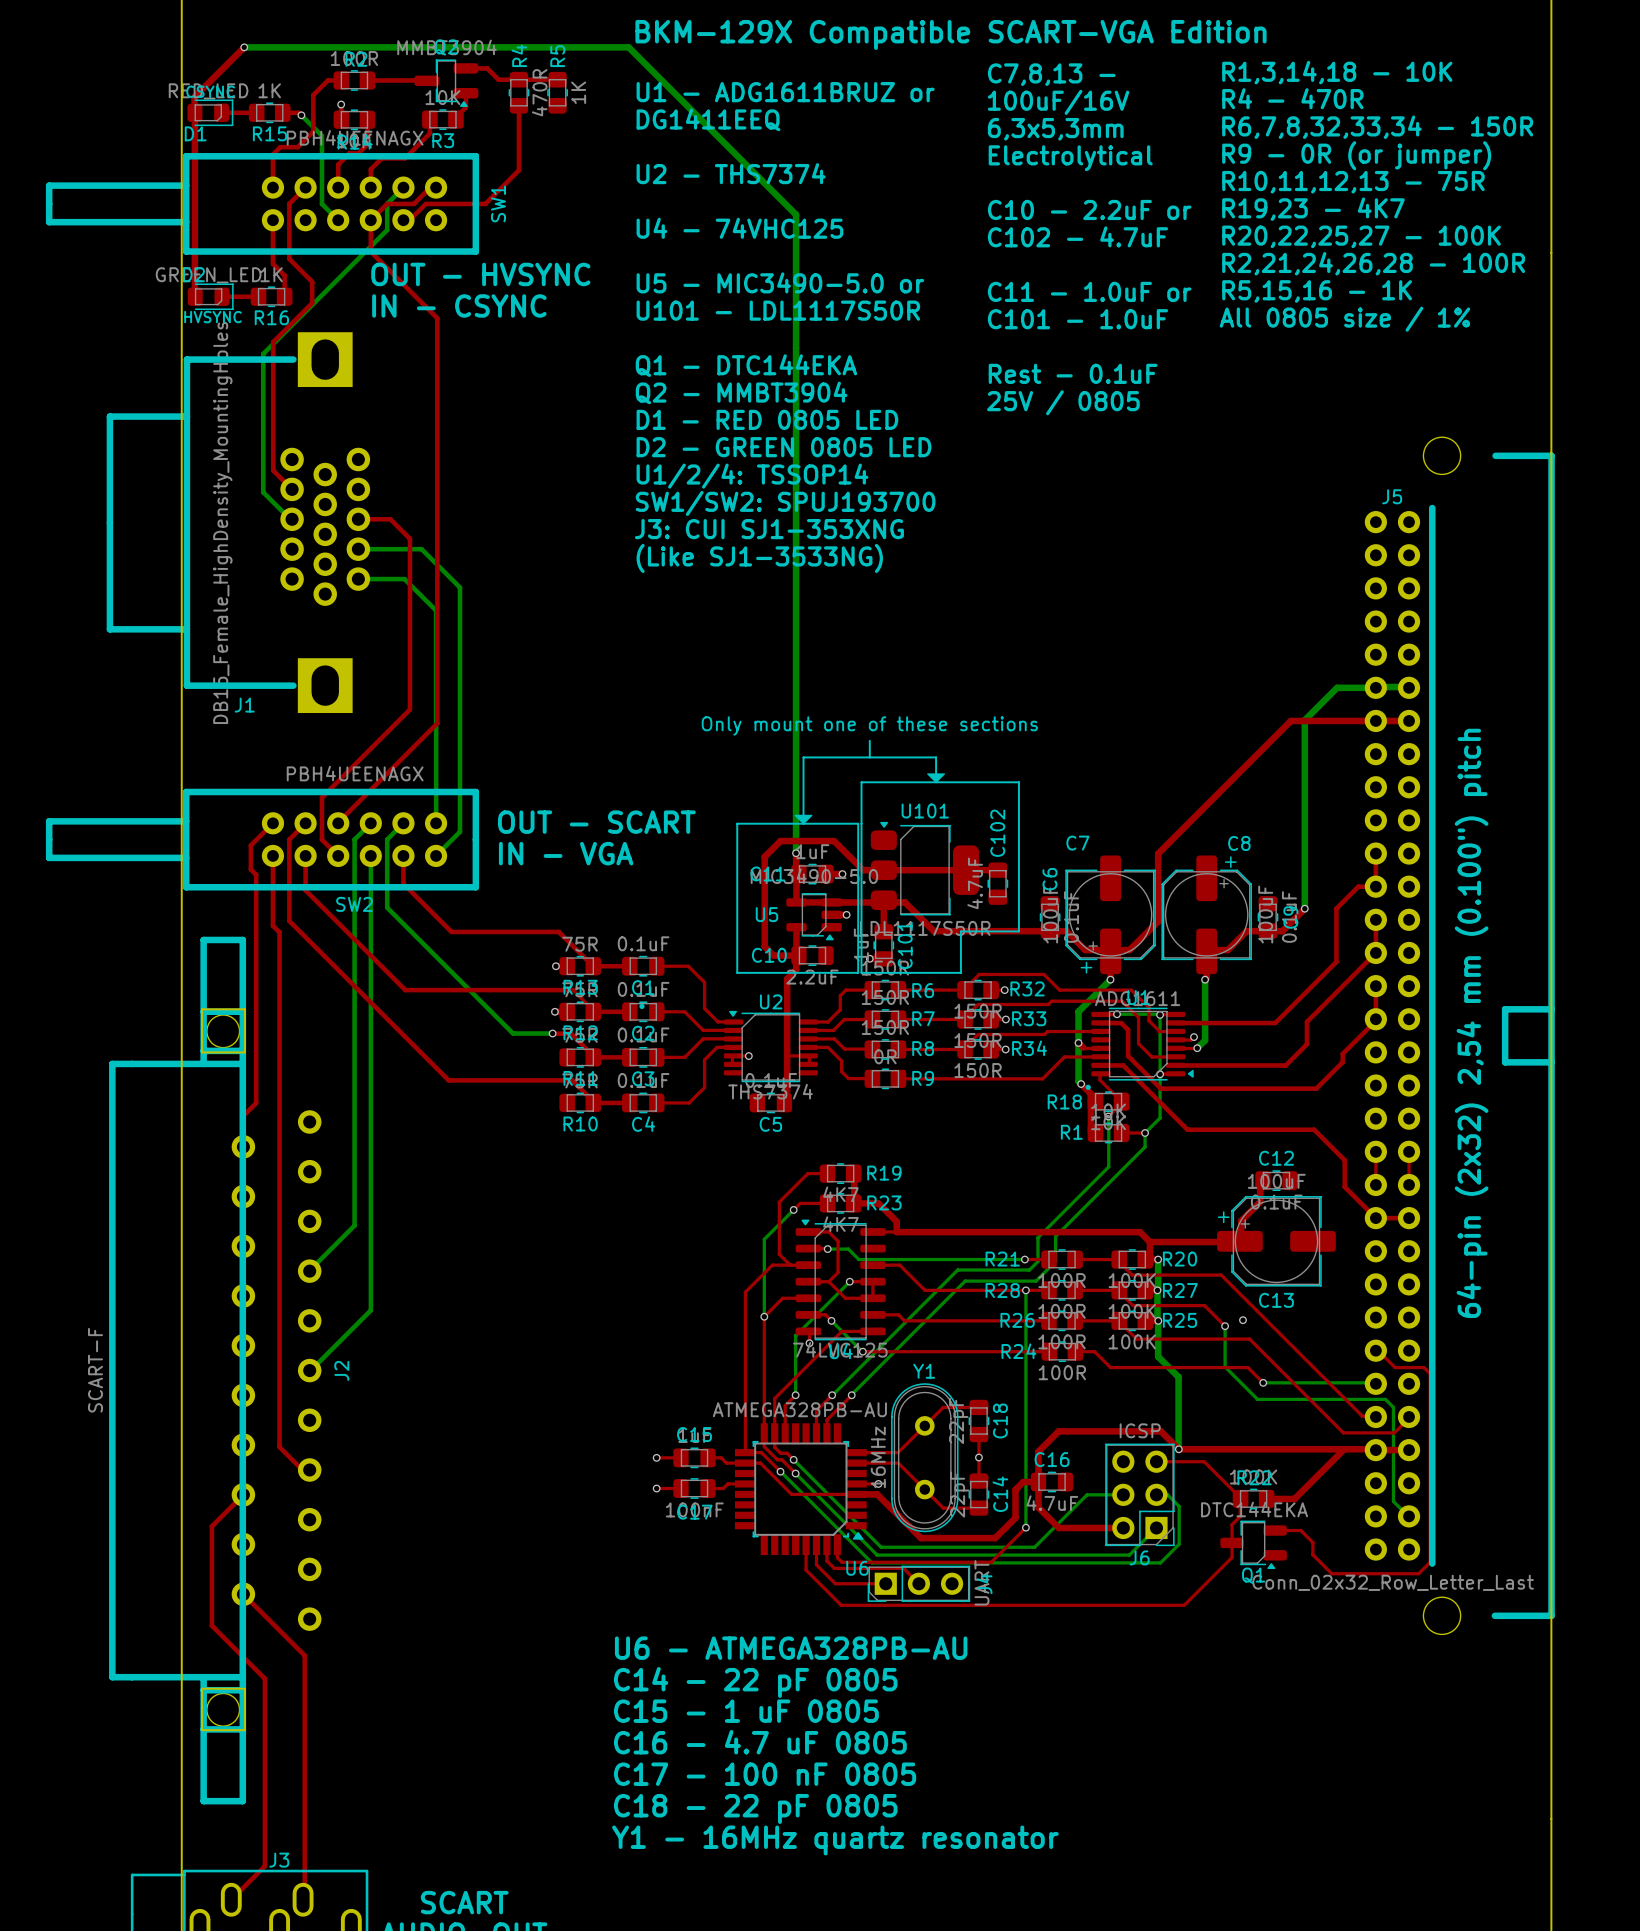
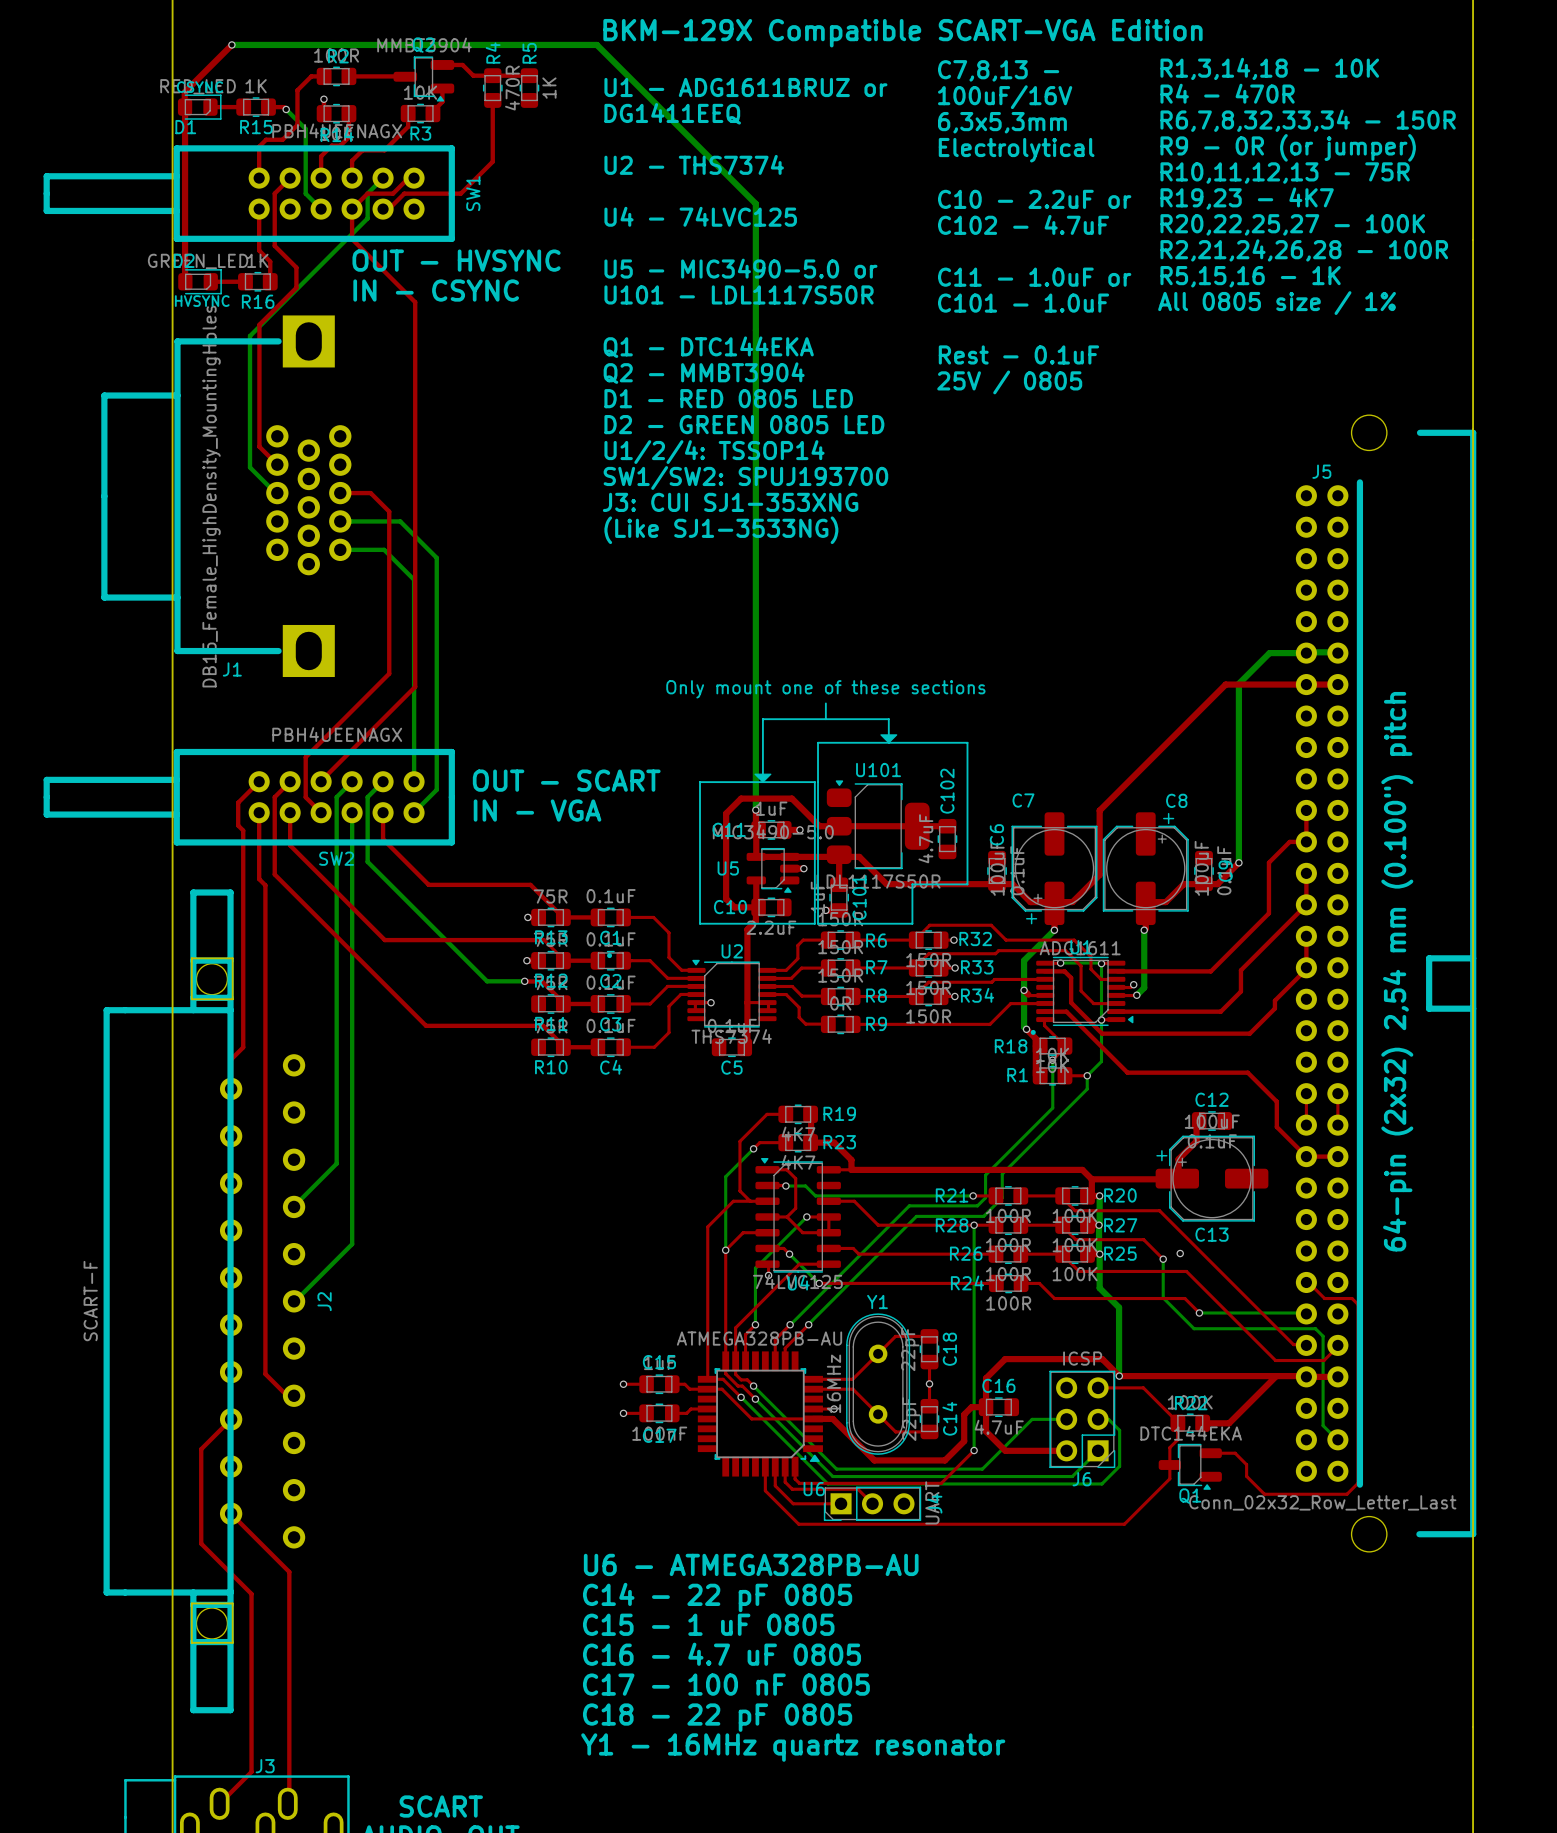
text: U4 - 74VHC125 (739, 228) -> U4 - 74LVC125 (700, 216)

